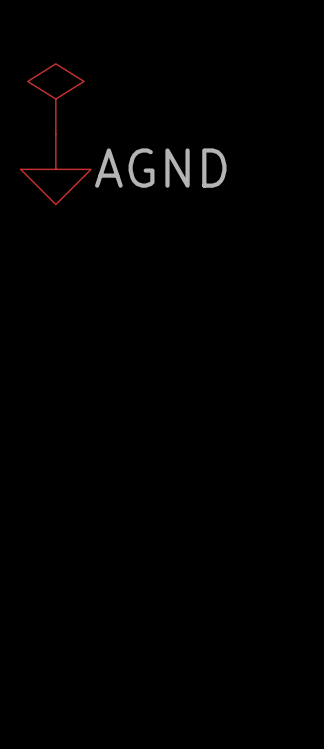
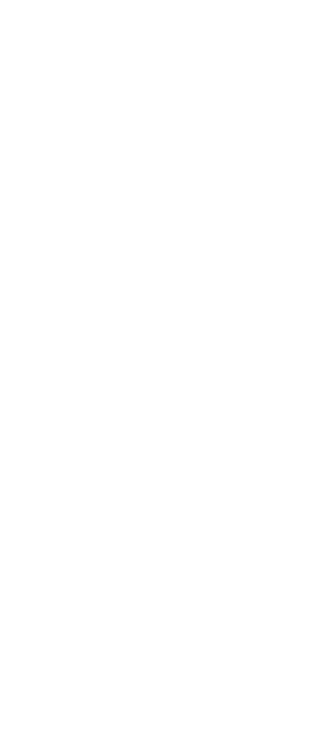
power symbol: (55, 99) -> none
power symbol: AGND (55, 169) -> none

